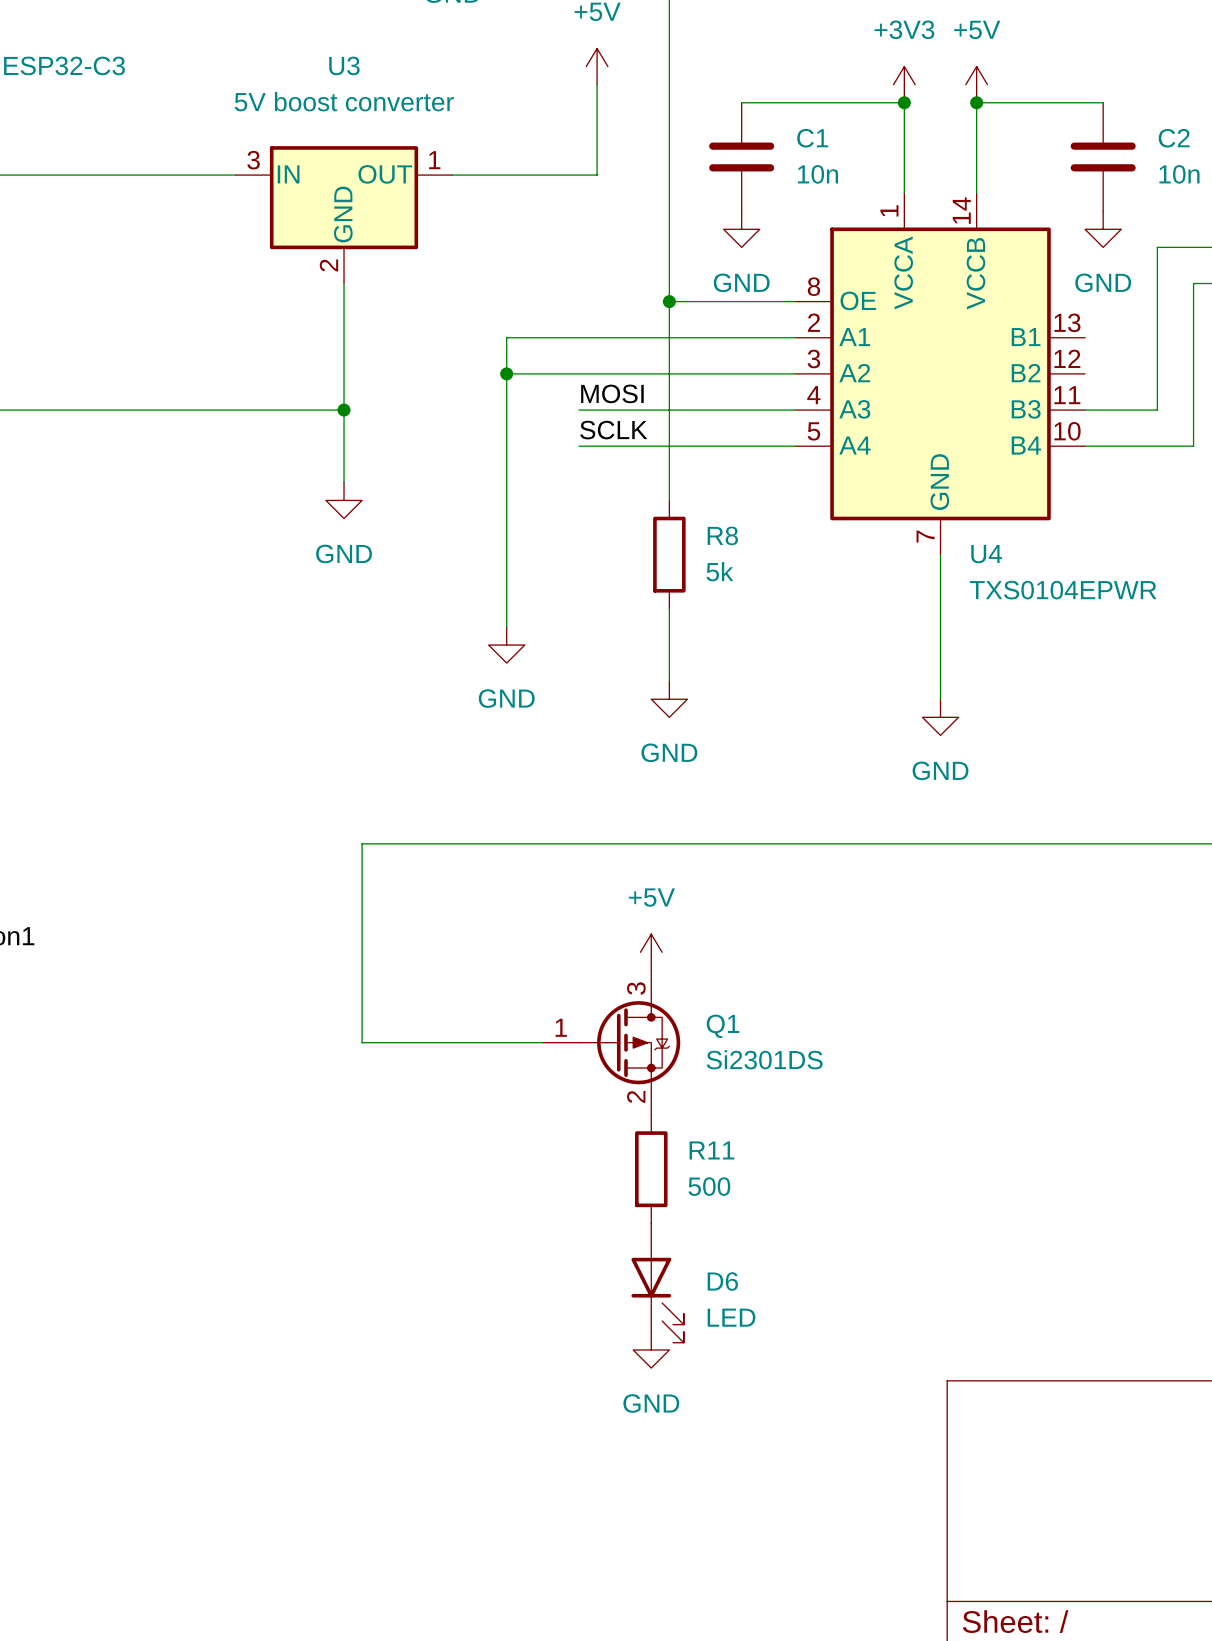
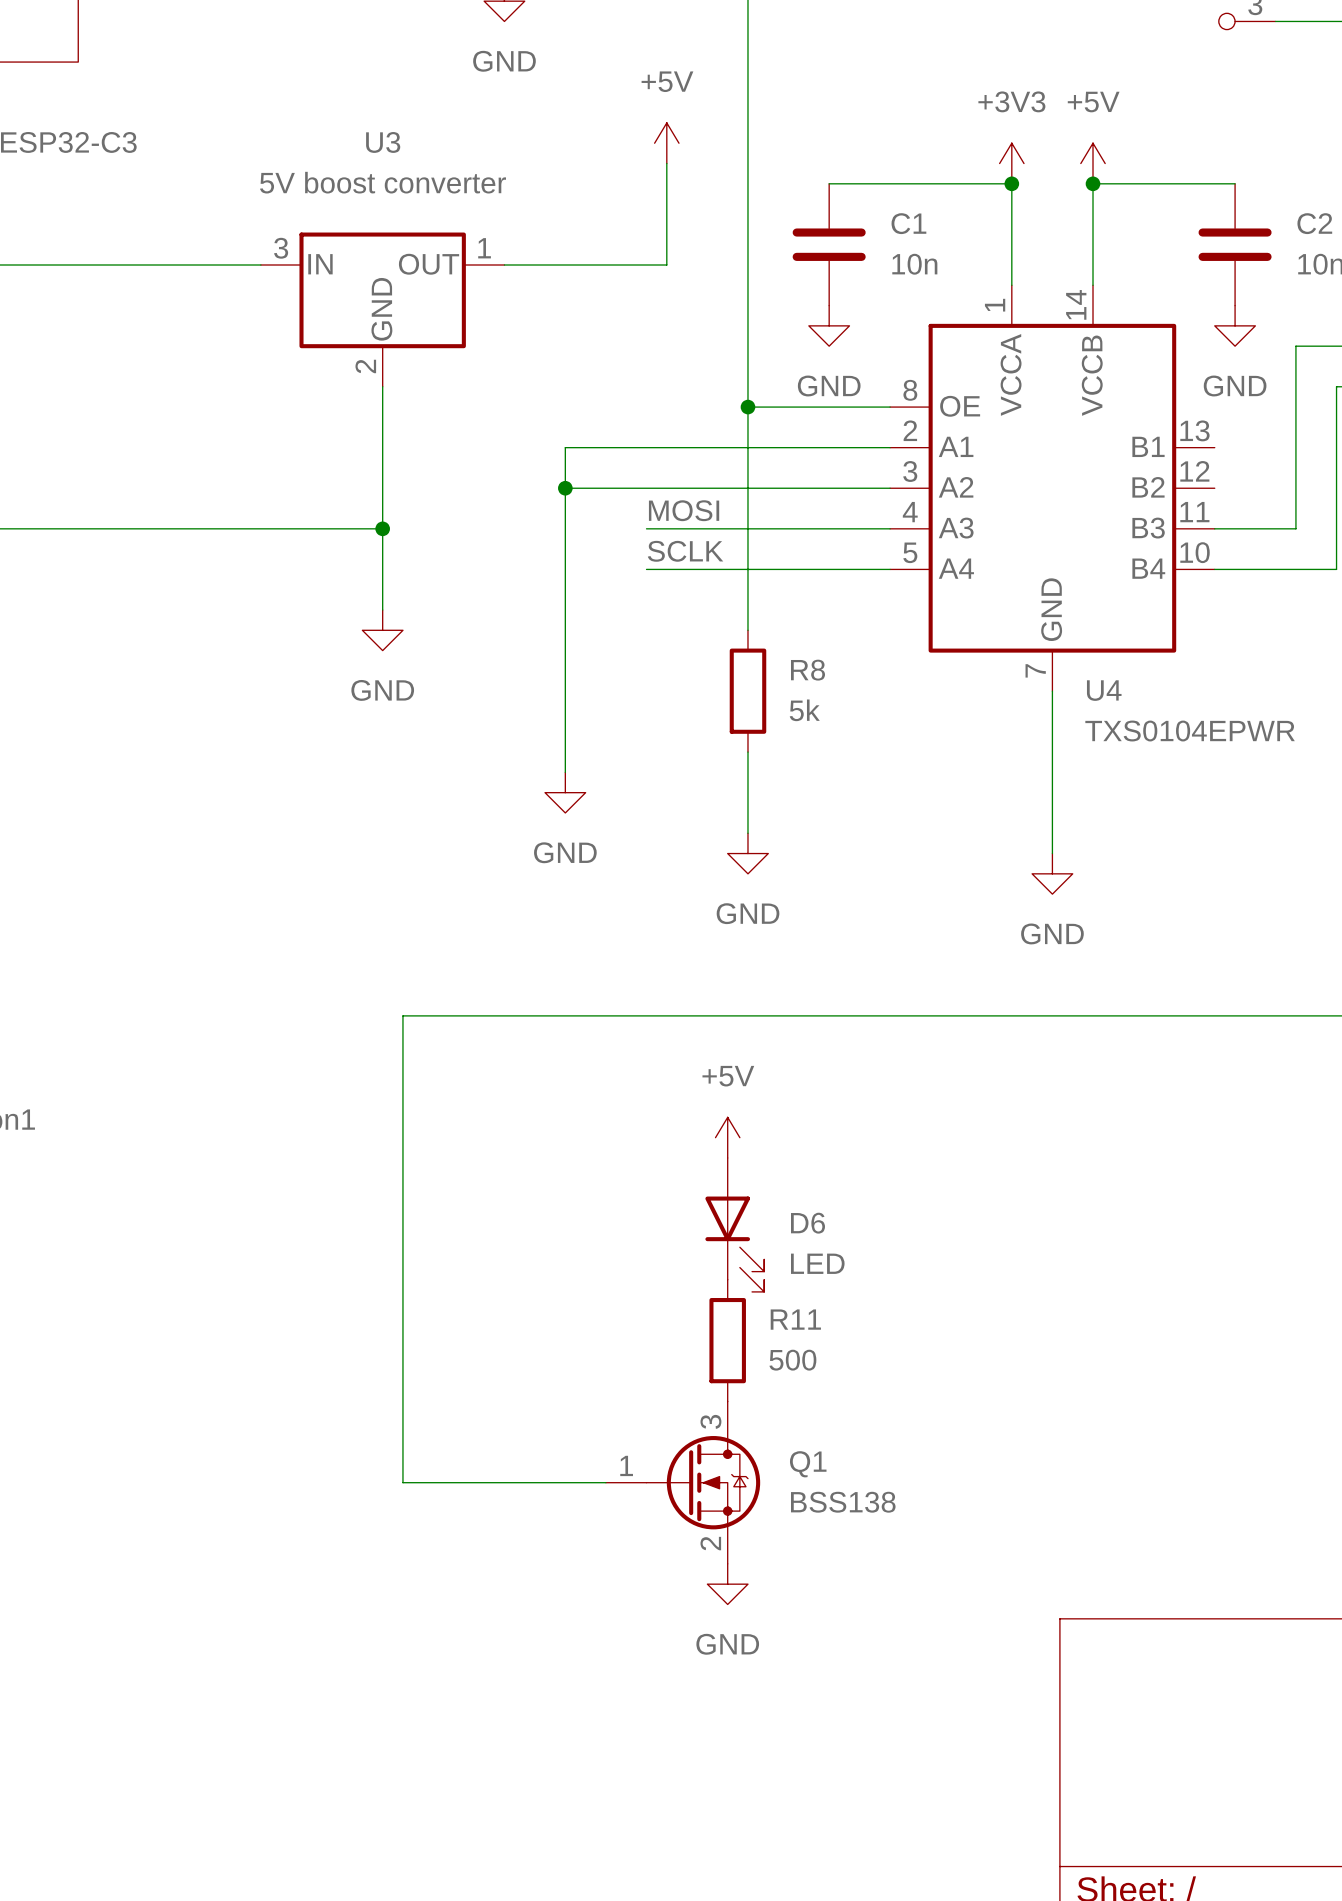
Q1 symbol: [542, 970, 681, 1115] -> [605, 1401, 761, 1564]
wire: (362, 1042) (542, 1042) -> (402, 1239) (402, 1482) (605, 1482)
Q1 value: Si2301DS (764, 1059) -> BSS138 (843, 1502)
R11 position: (651, 1169) -> (727, 1340)
D6 position: (657, 1283) -> (734, 1224)

